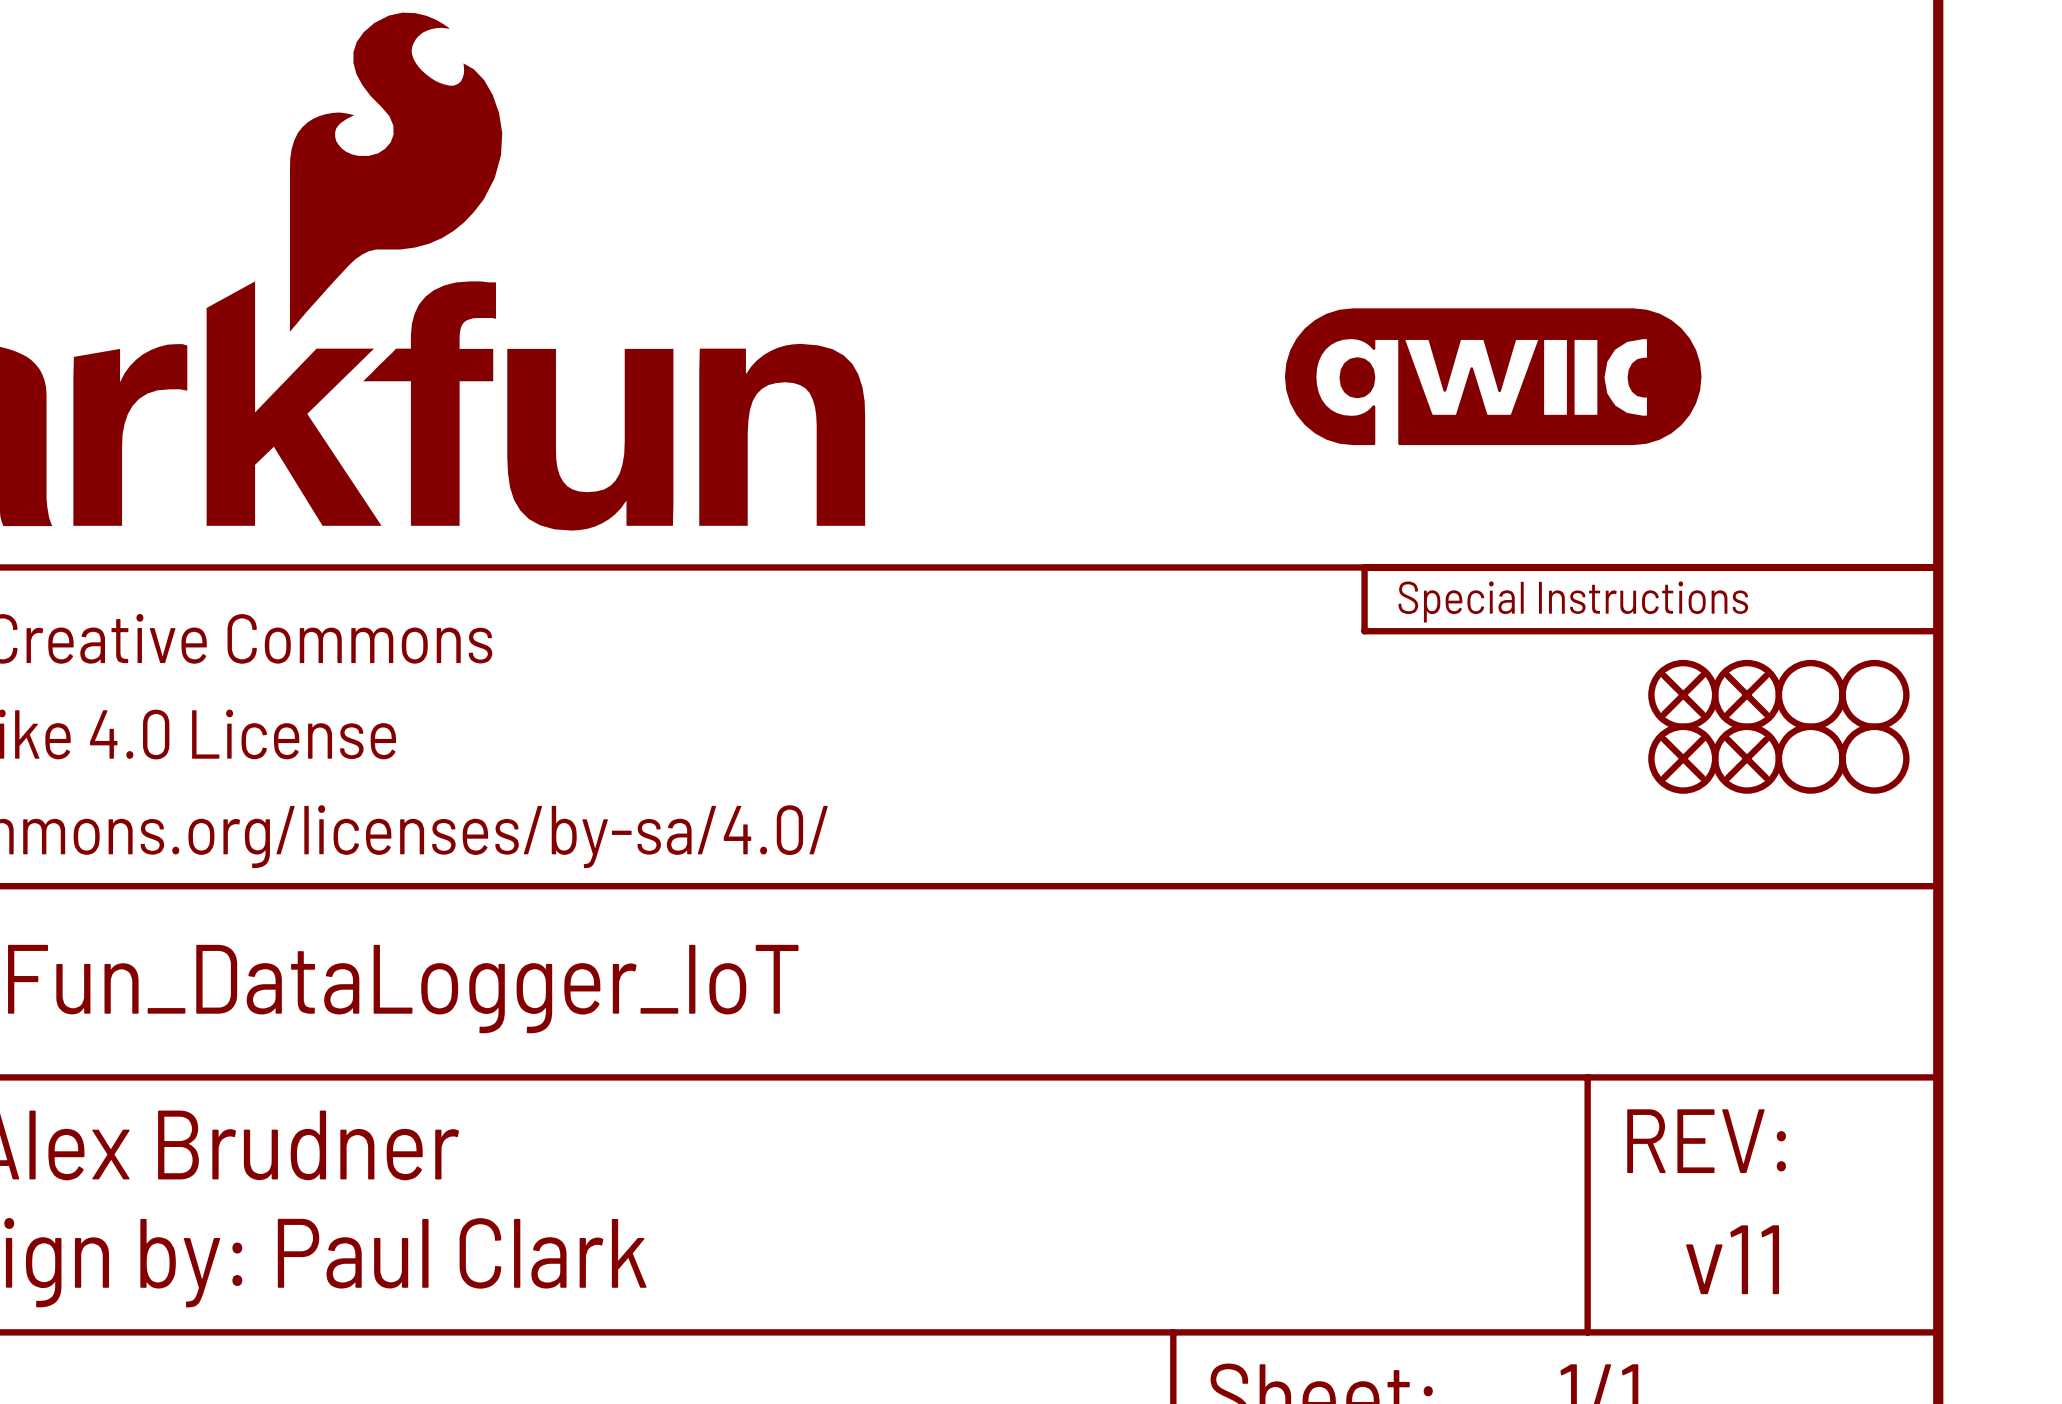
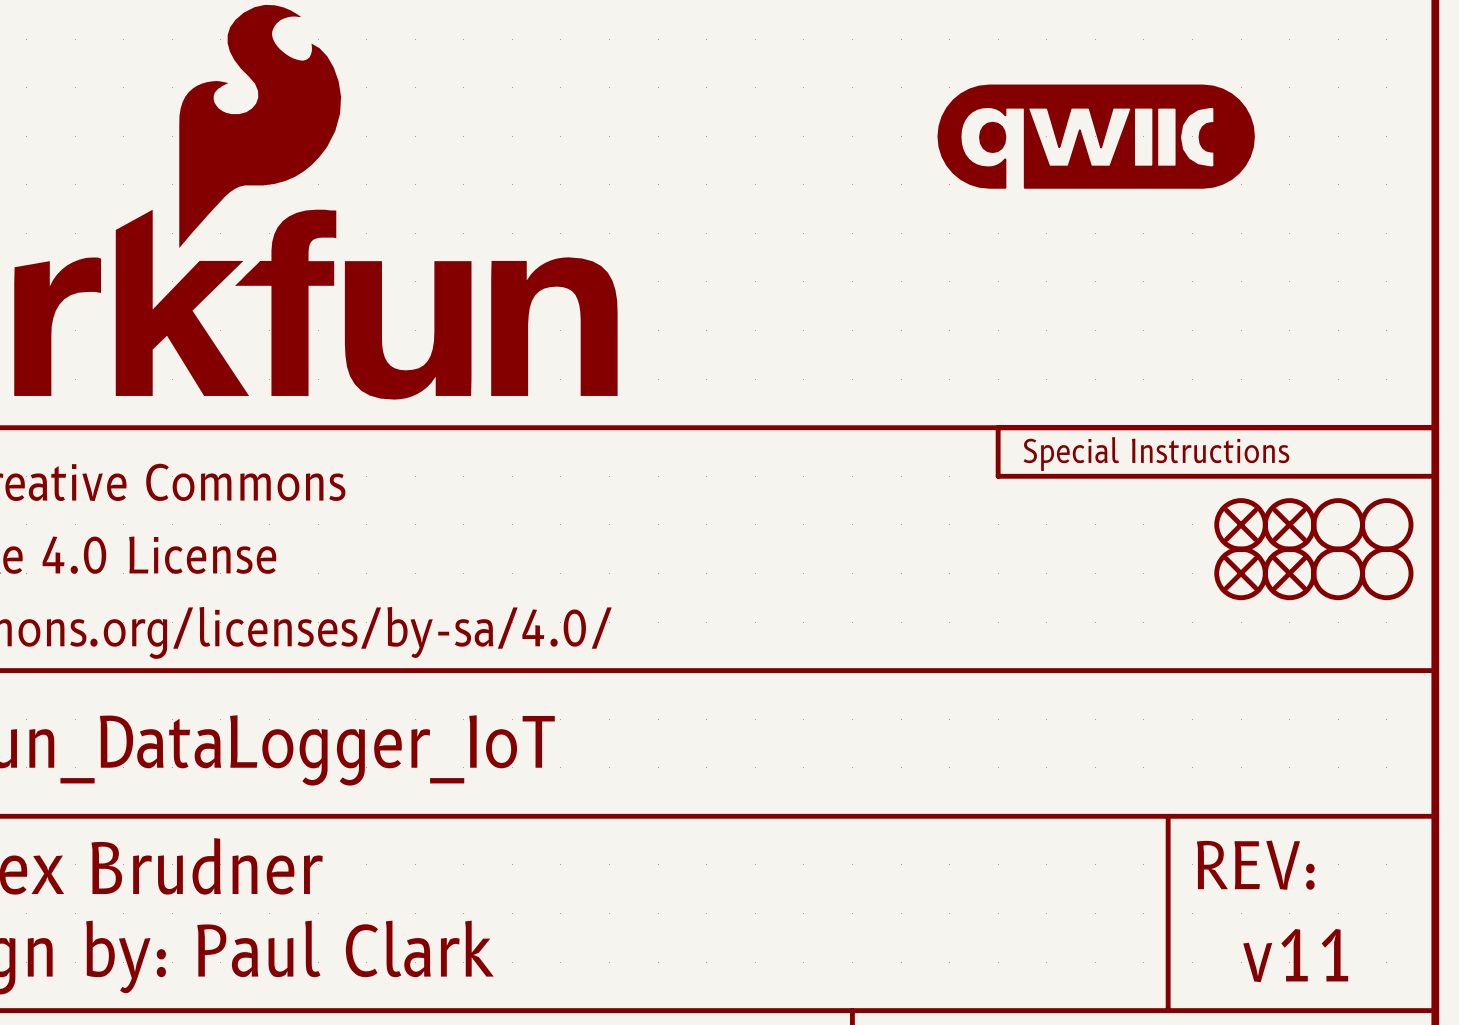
part position: (1493, 376) -> (1096, 136)

